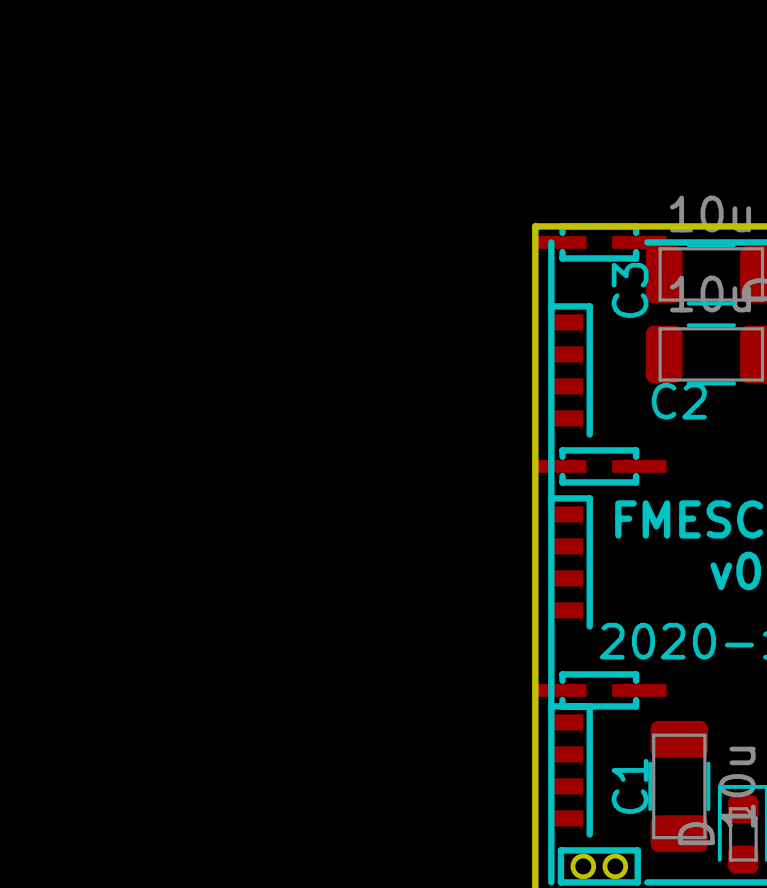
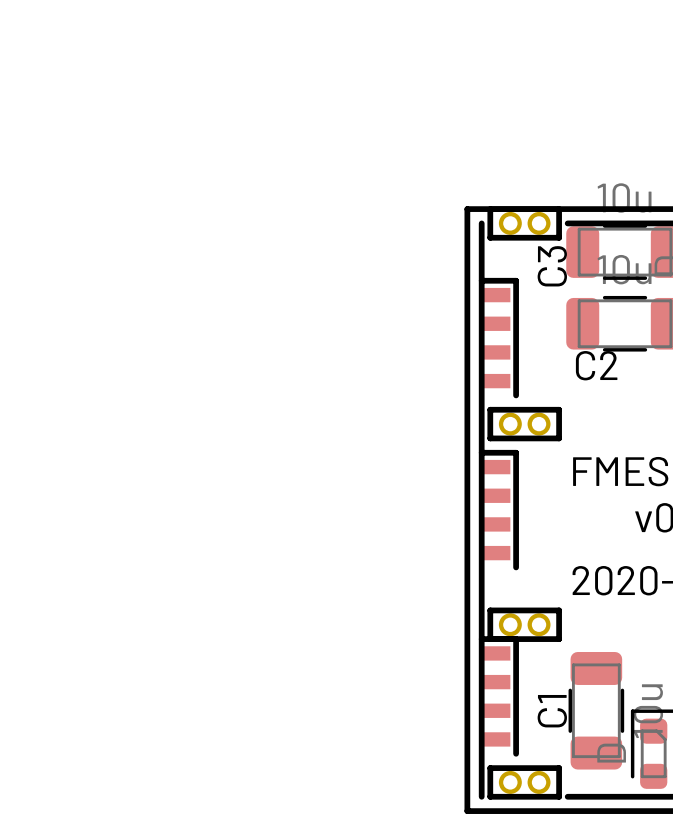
part footprint: [532, 223, 667, 262] -> [487, 206, 562, 241]
part footprint: [532, 447, 667, 486] -> [487, 406, 562, 442]
part footprint: [532, 671, 667, 710] -> [487, 607, 562, 642]

